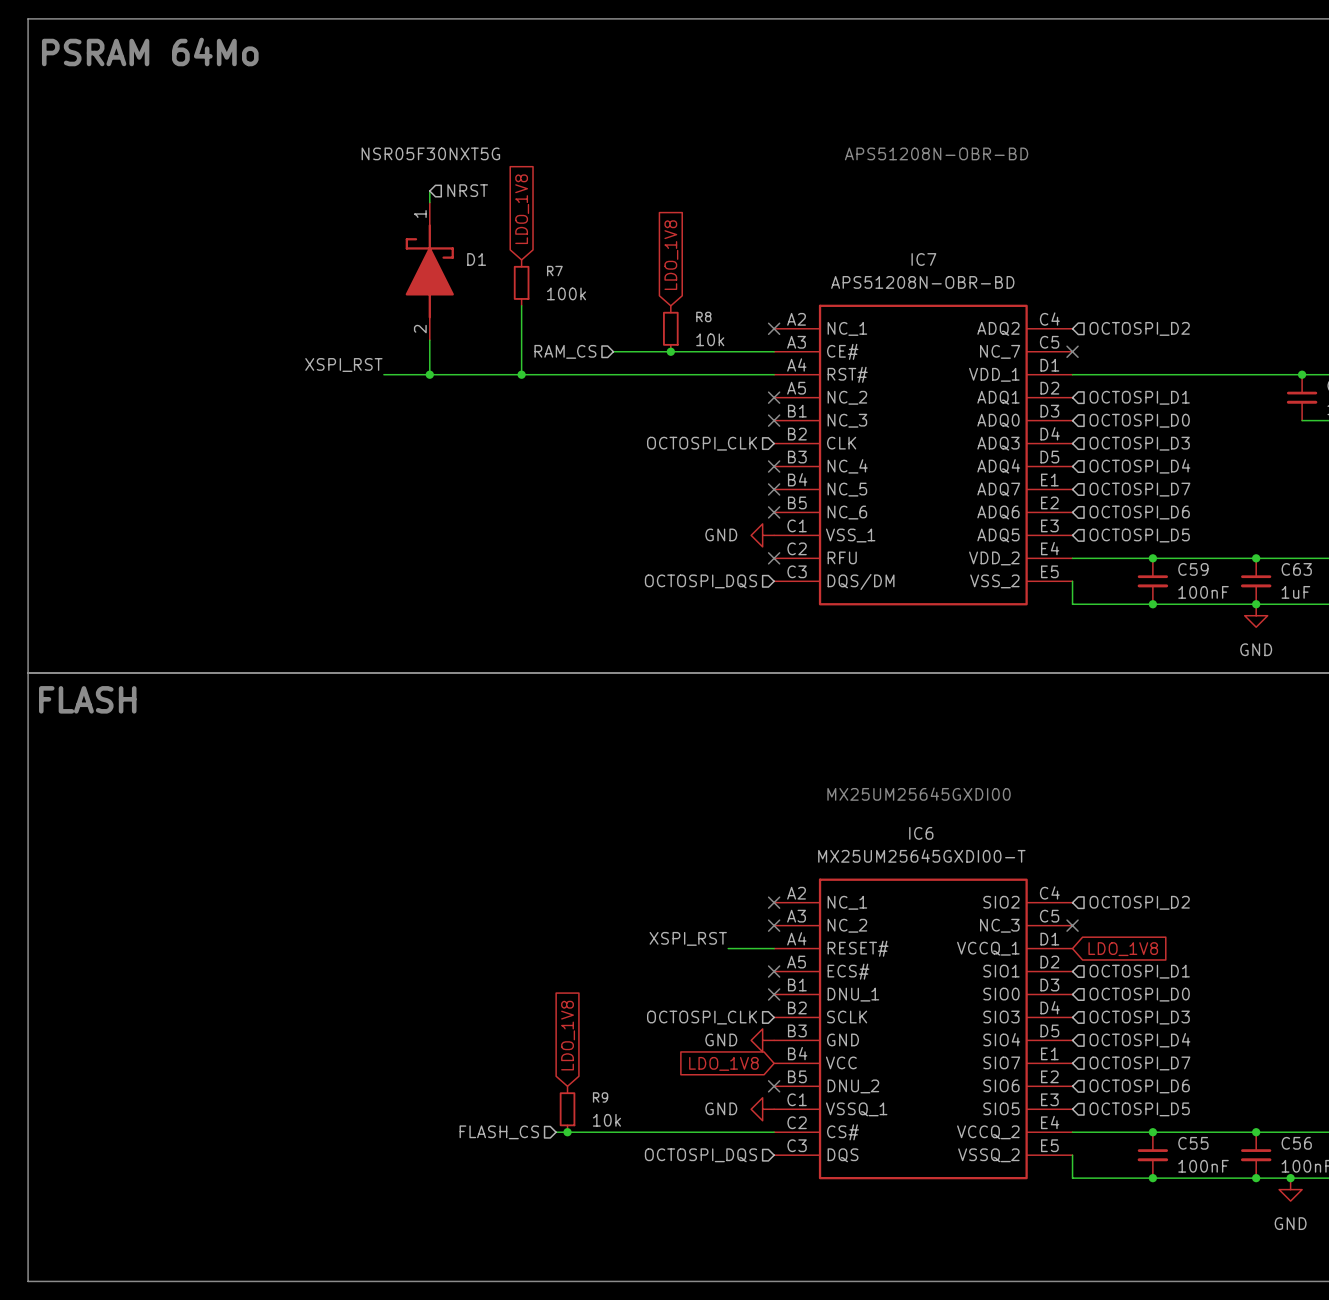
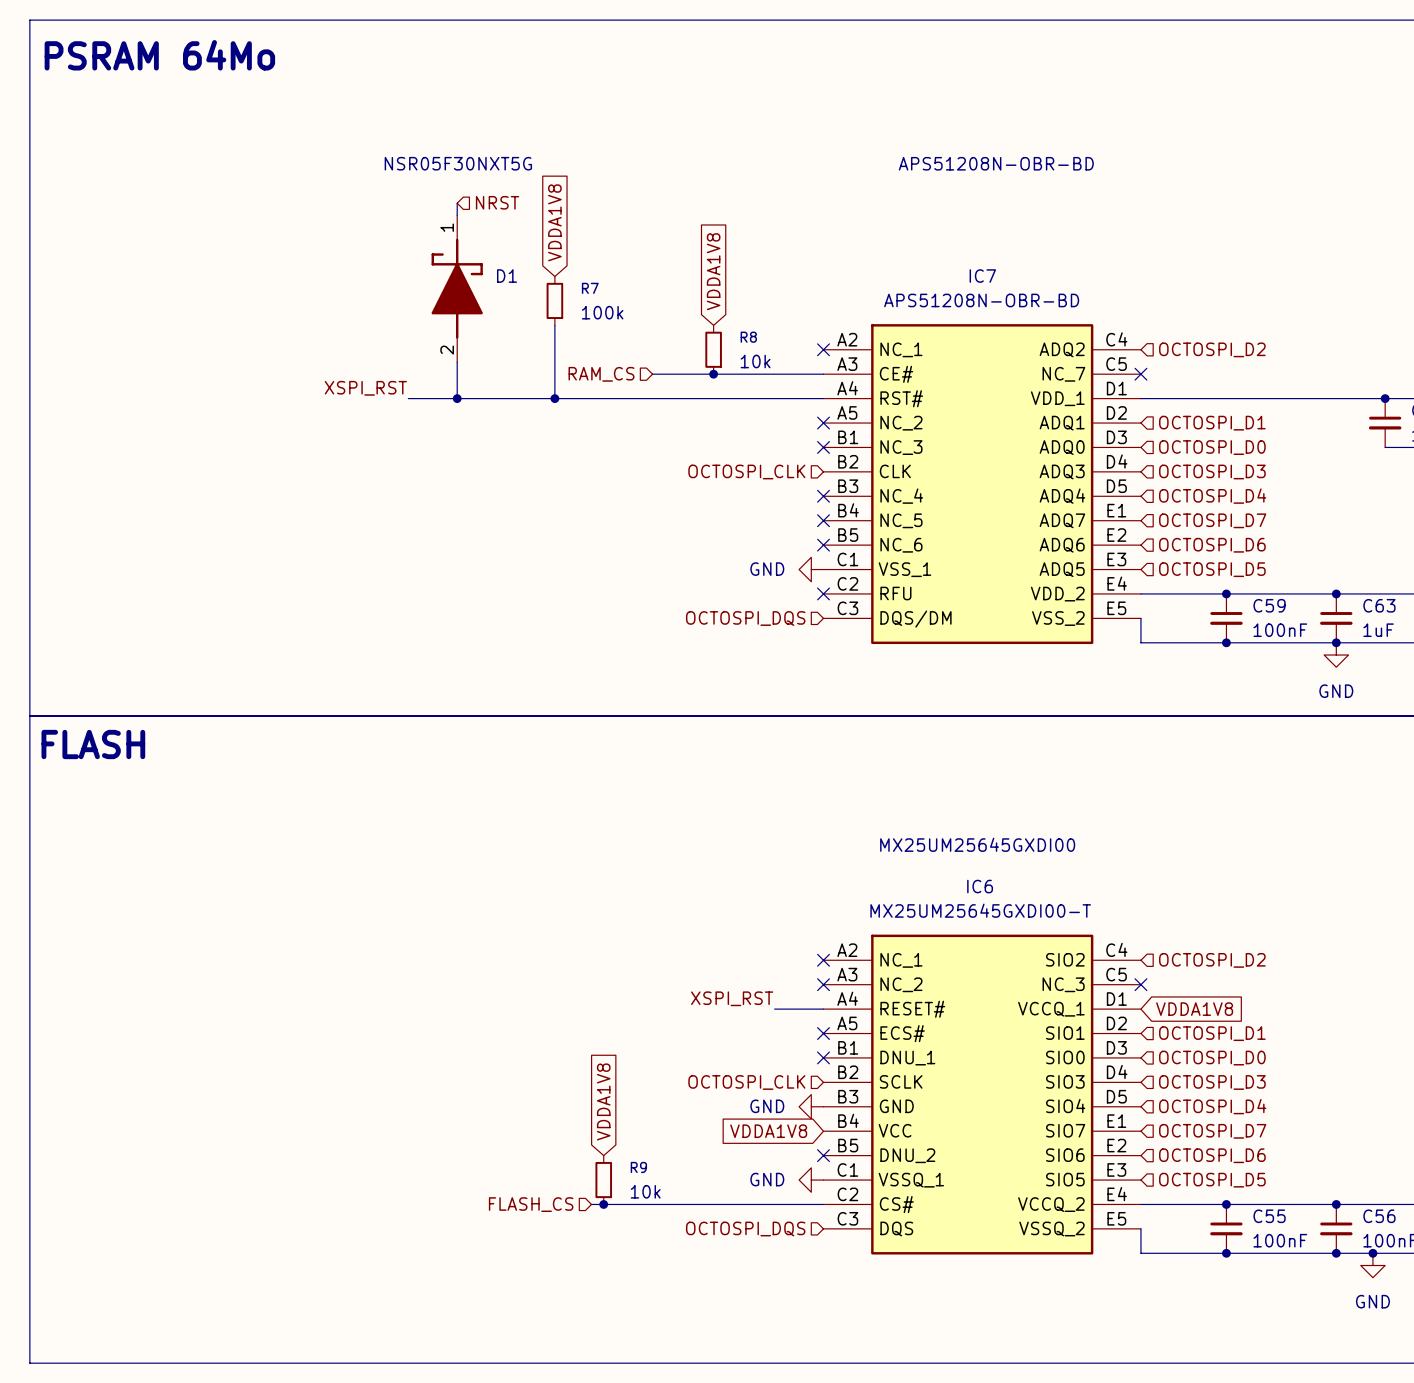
global label: LDO_1V8 (522, 209) -> VDDA1V8 (554, 222)
global label: LDO_1V8 (671, 255) -> VDDA1V8 (713, 271)
global label: LDO_1V8 (1123, 949) -> VDDA1V8 (1194, 1009)
global label: LDO_1V8 (568, 1035) -> VDDA1V8 (603, 1101)
global label: LDO_1V8 (723, 1063) -> VDDA1V8 (768, 1131)

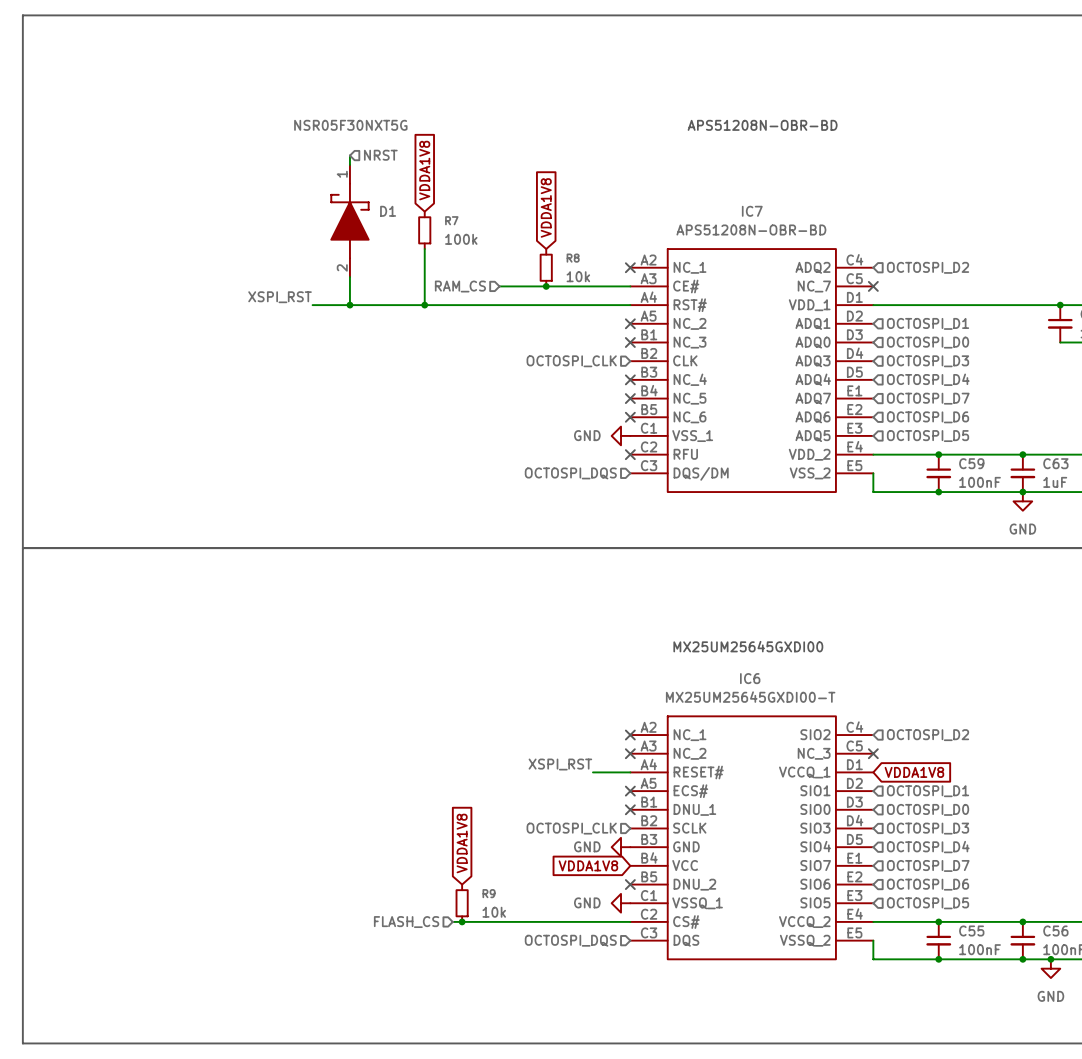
text: PSRAM 64Mo (159, 55) -> none
text: FLASH (93, 744) -> none

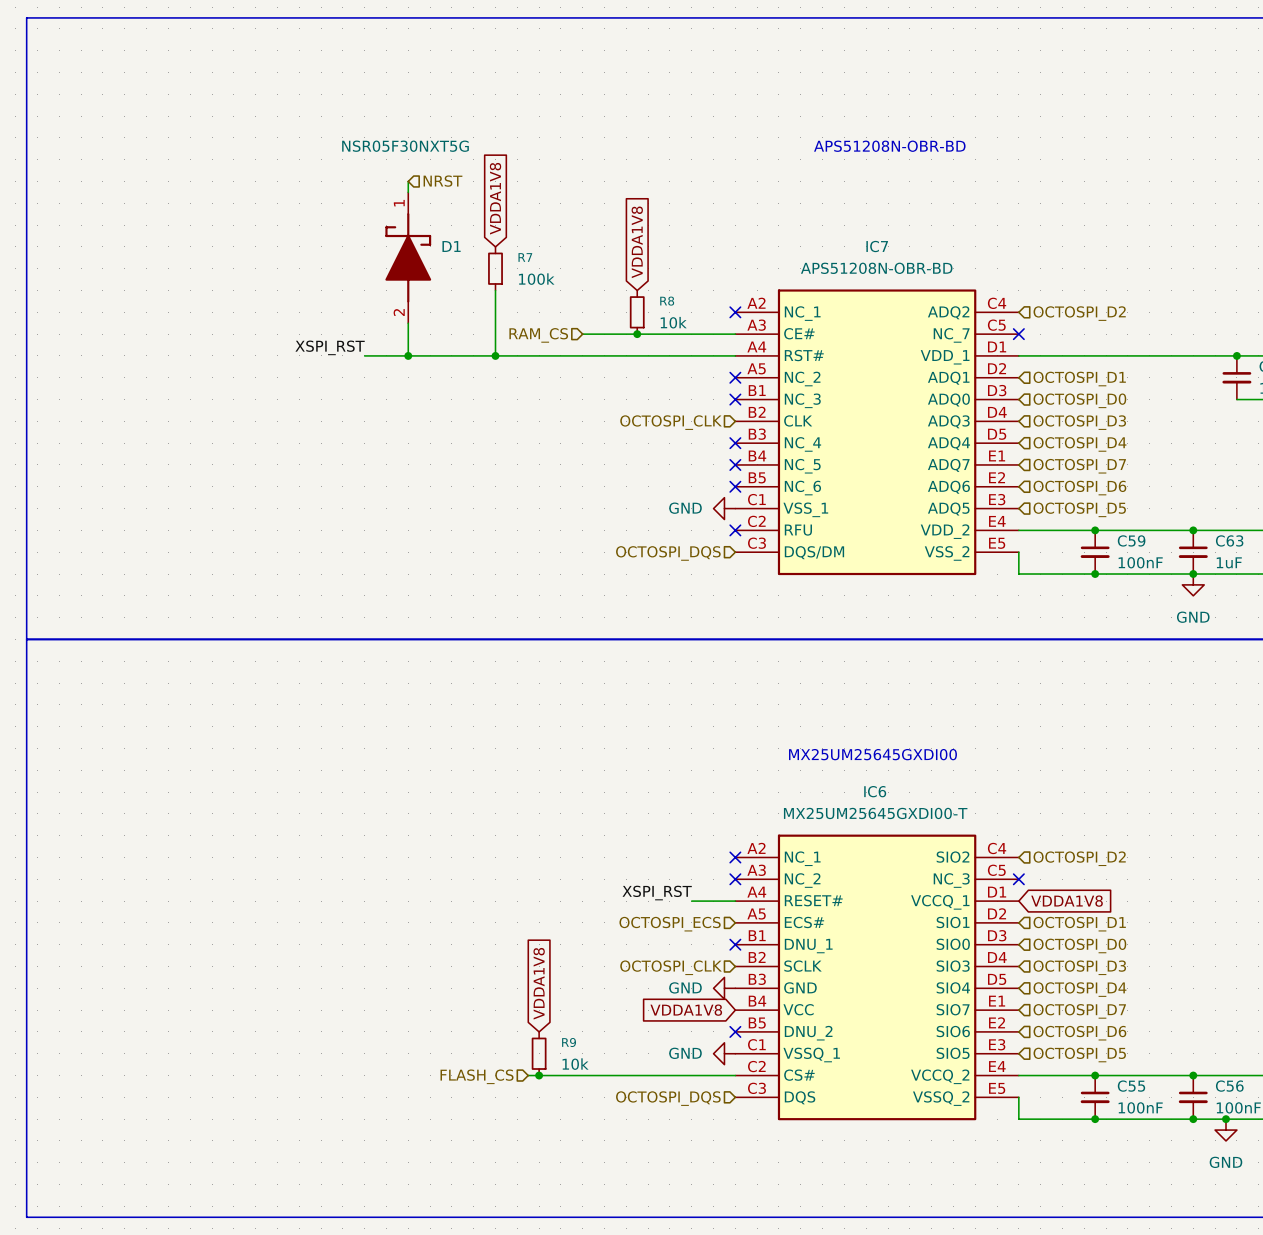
hierarchical label: none -> OCTOSPI_ECS (670, 924)
no-connect mark: (630, 791) -> none

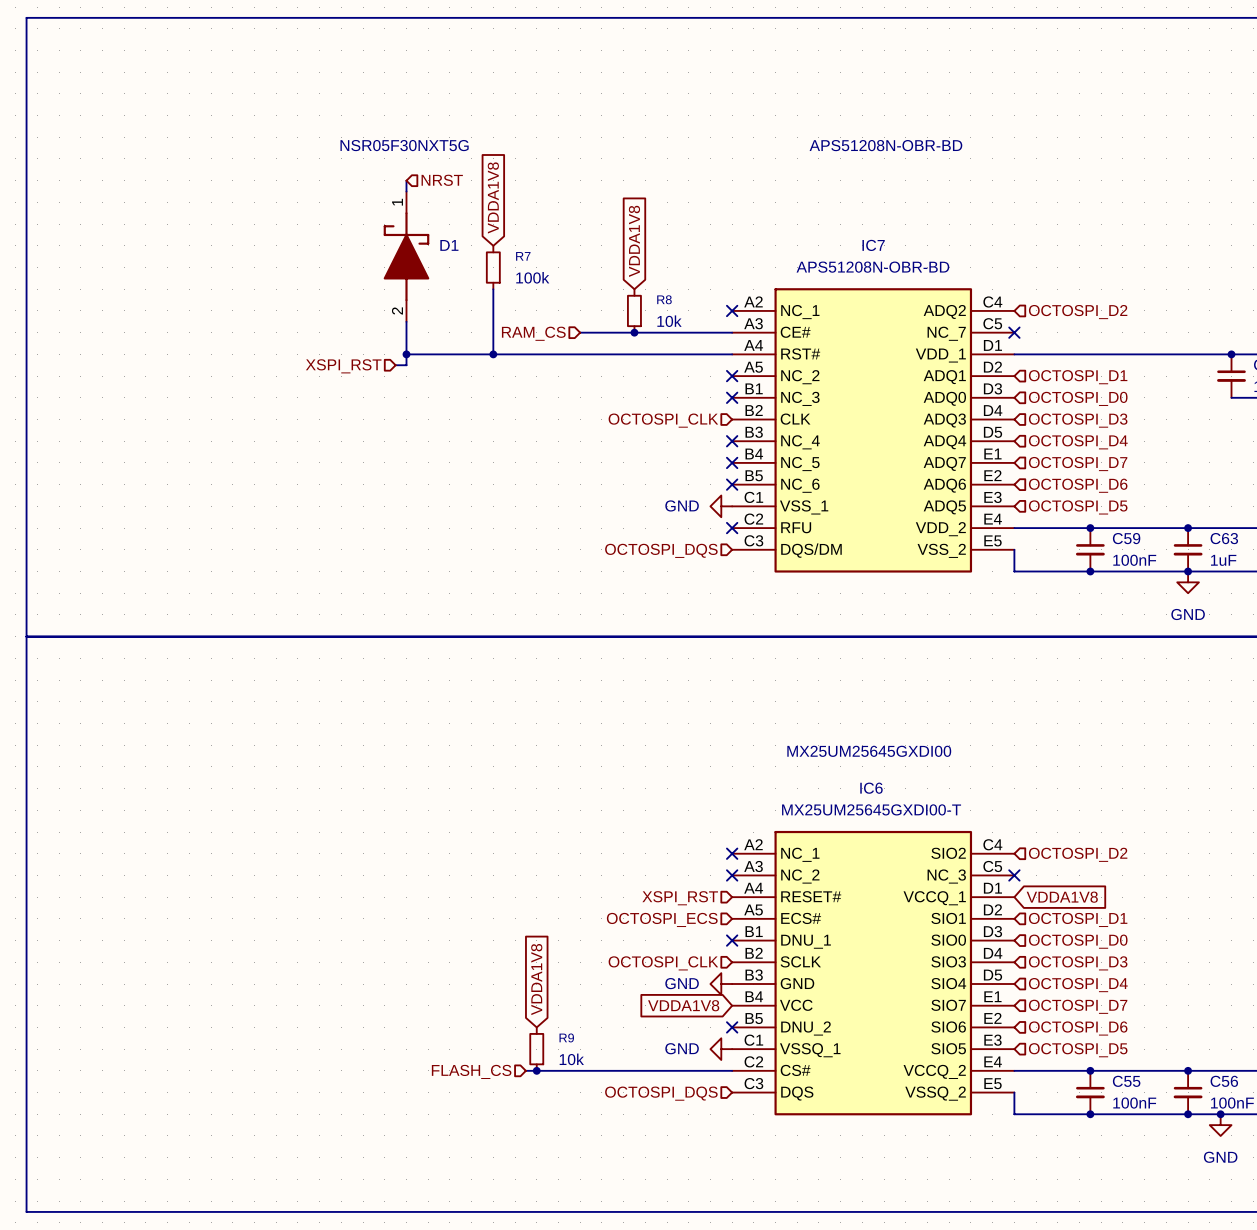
label: XSPI_RST (330, 347) -> none
wire: (364, 355) (408, 355) -> (395, 365) (406, 365) (406, 354)
hierarchical label: none -> XSPI_RST (343, 366)
label: XSPI_RST (657, 893) -> none
wire: (691, 901) (735, 901) -> none
hierarchical label: none -> XSPI_RST (680, 898)

